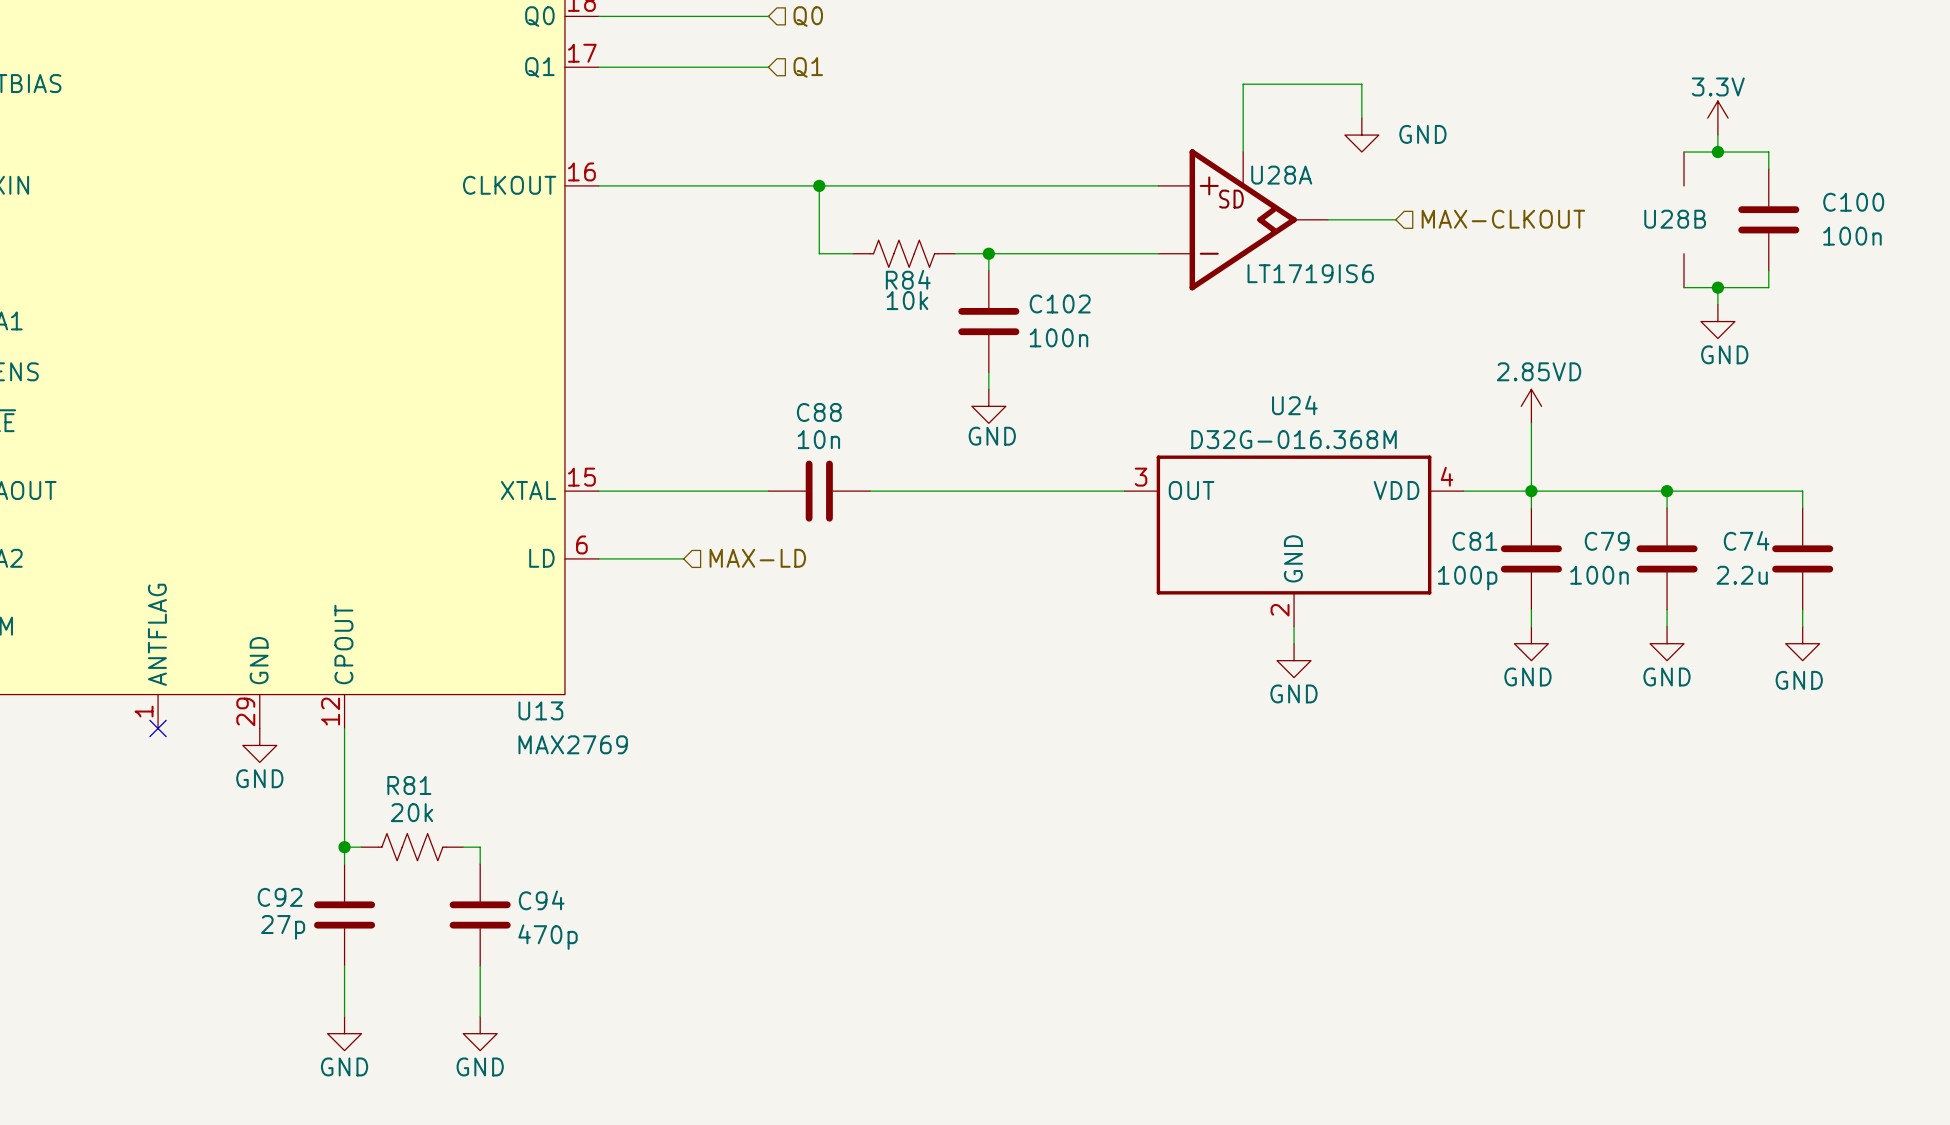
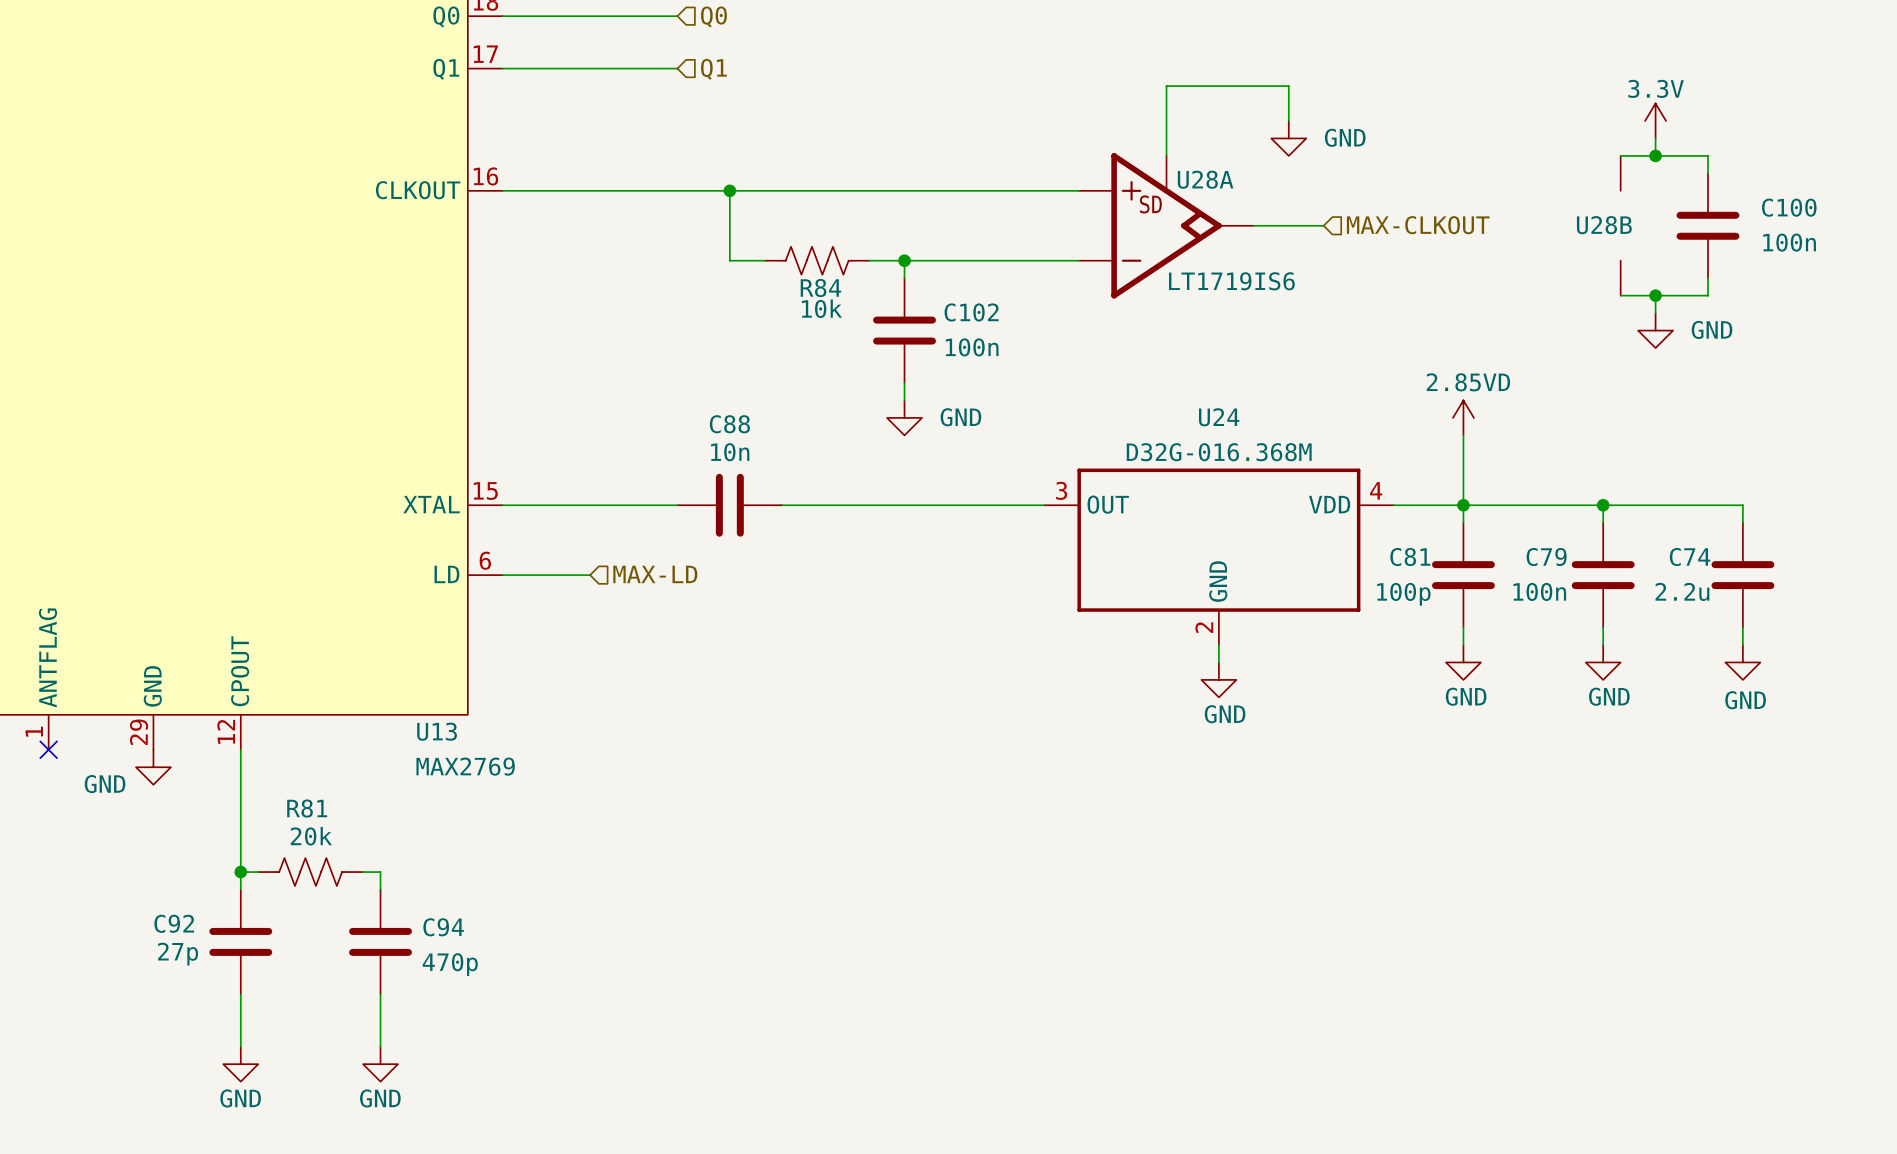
power symbol text position: GND (1724, 354) -> GND (1712, 329)
power symbol text position: GND (992, 436) -> GND (960, 417)
power symbol text position: GND (259, 778) -> GND (105, 784)

